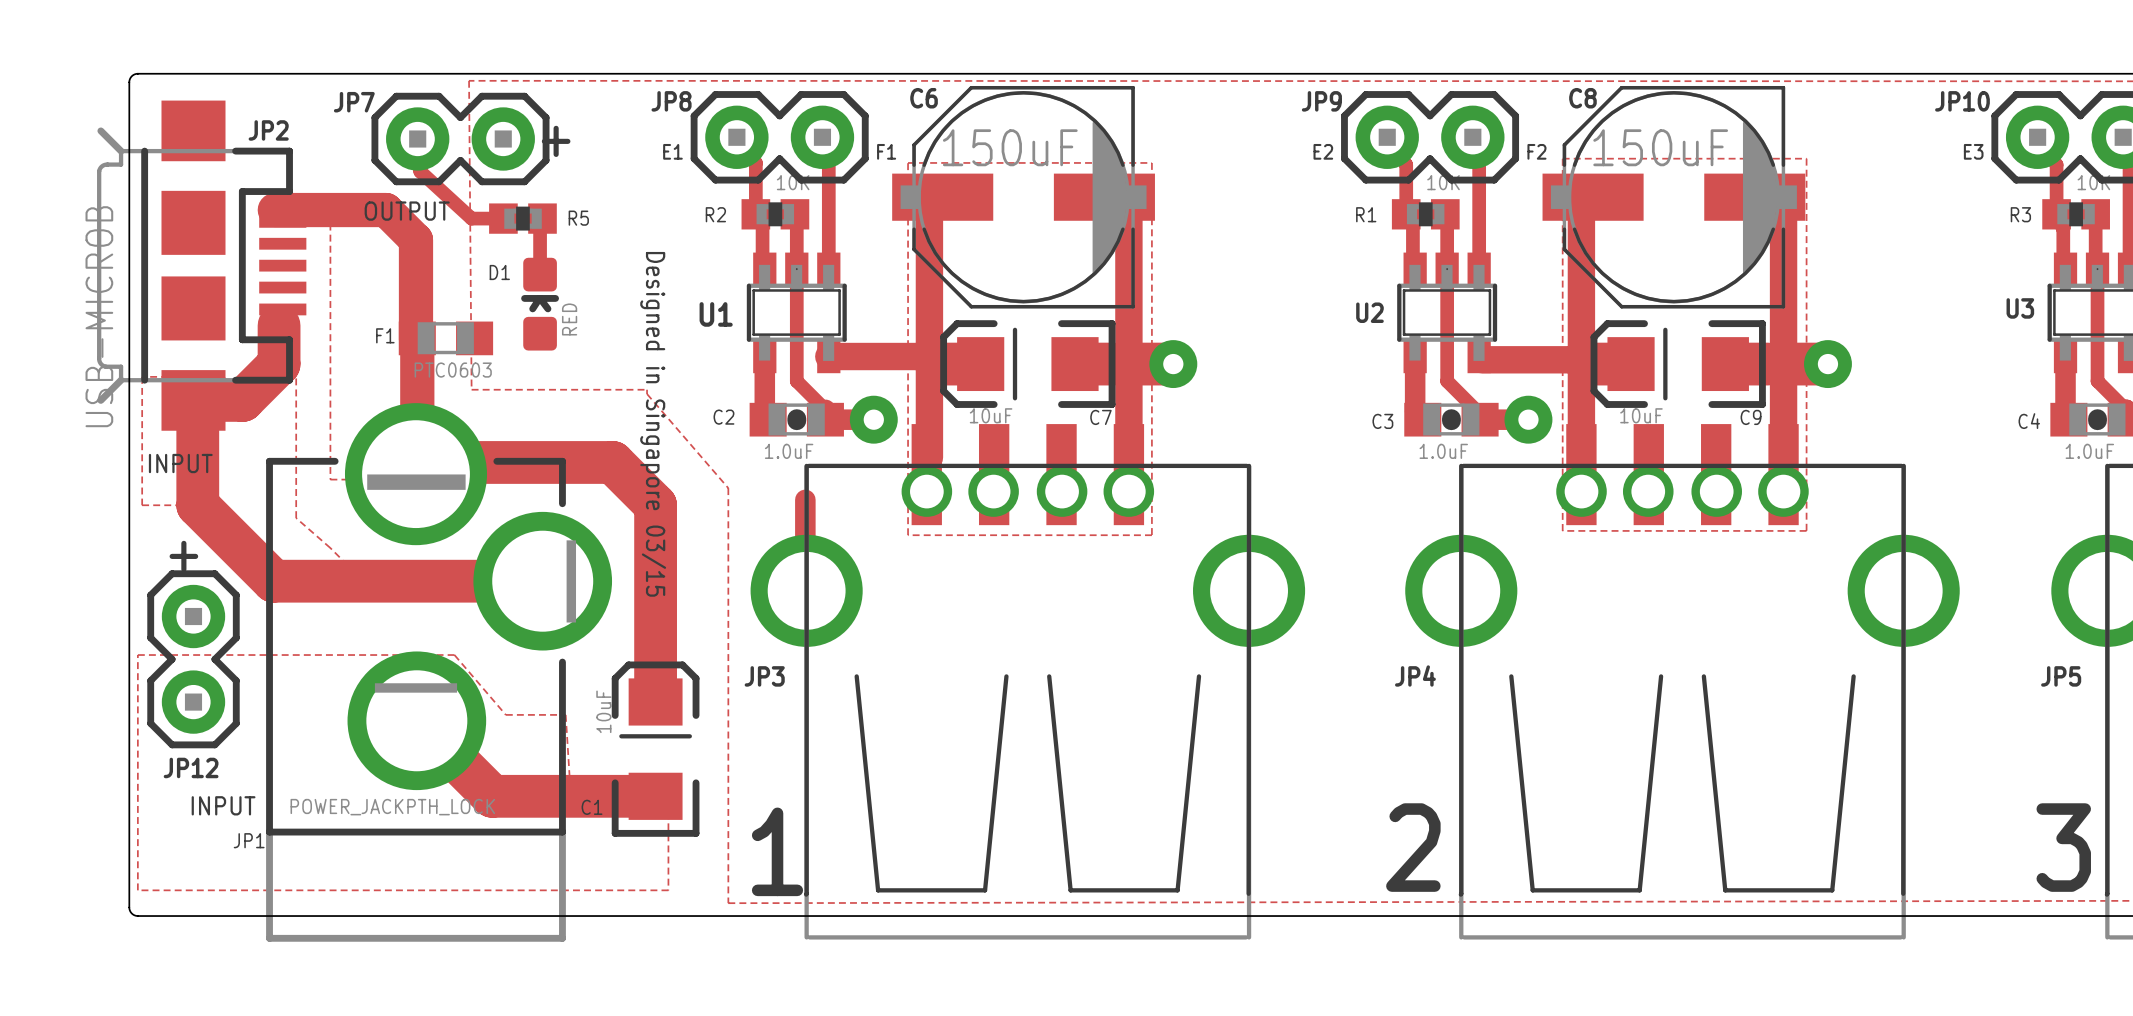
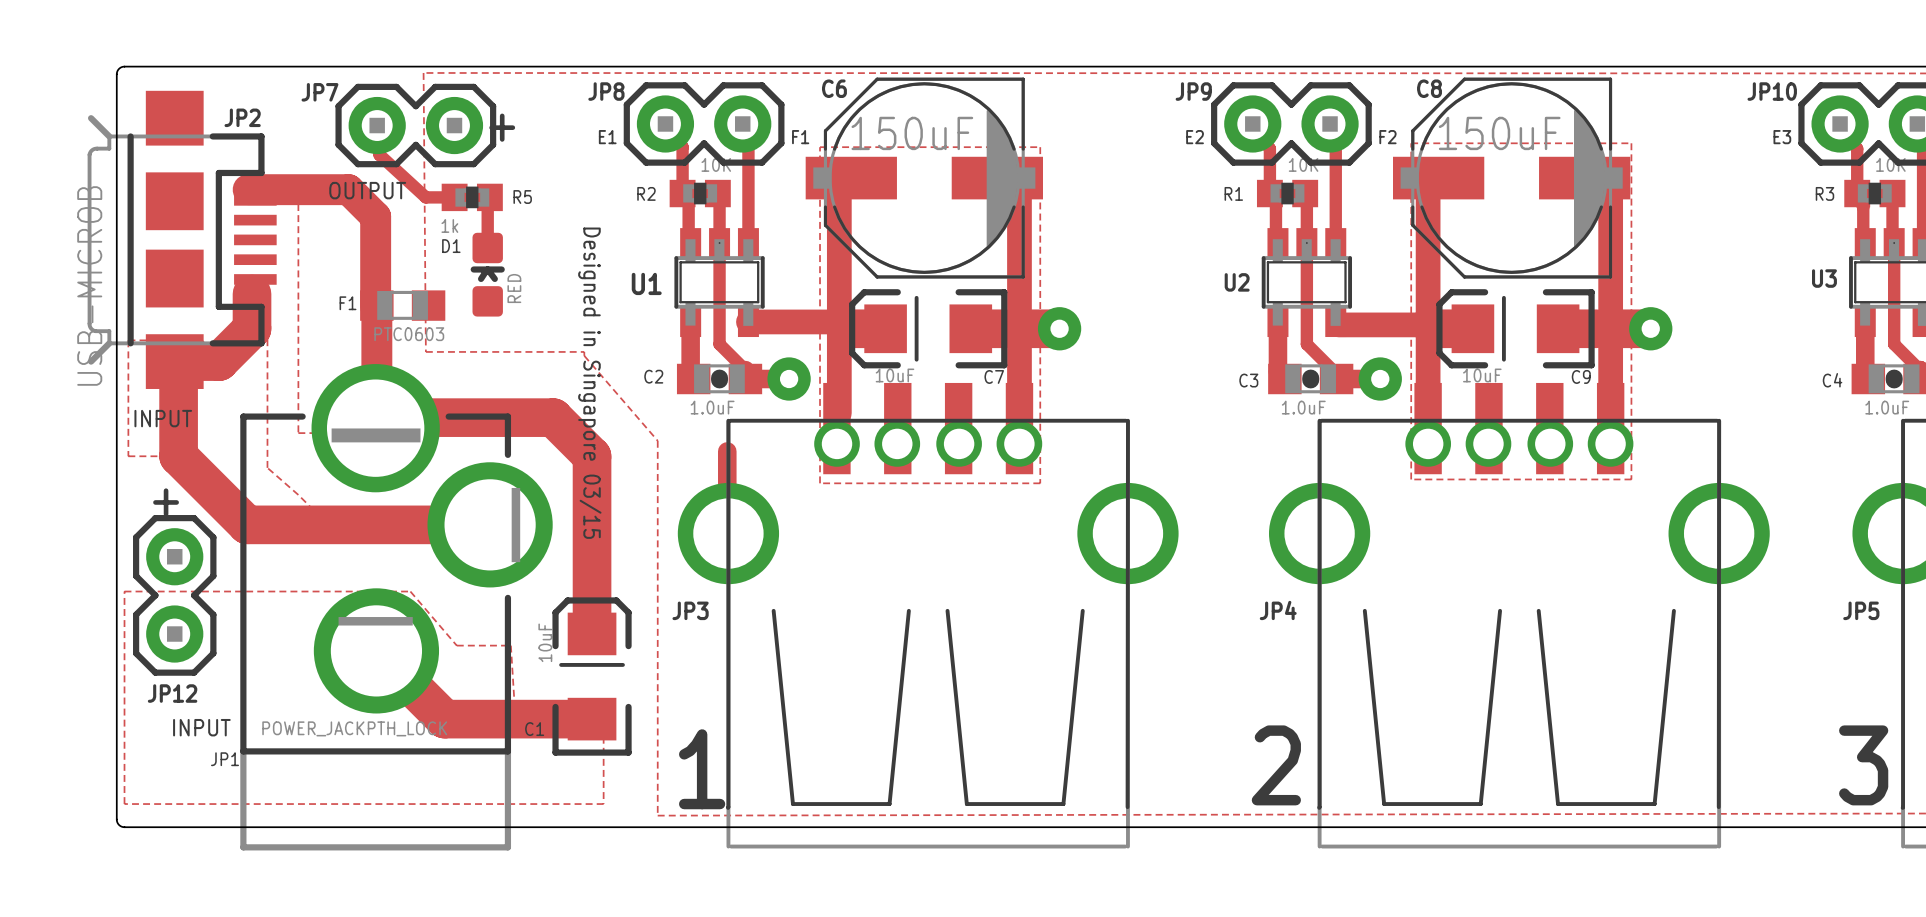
R5 value: none -> 1k (449, 225)

